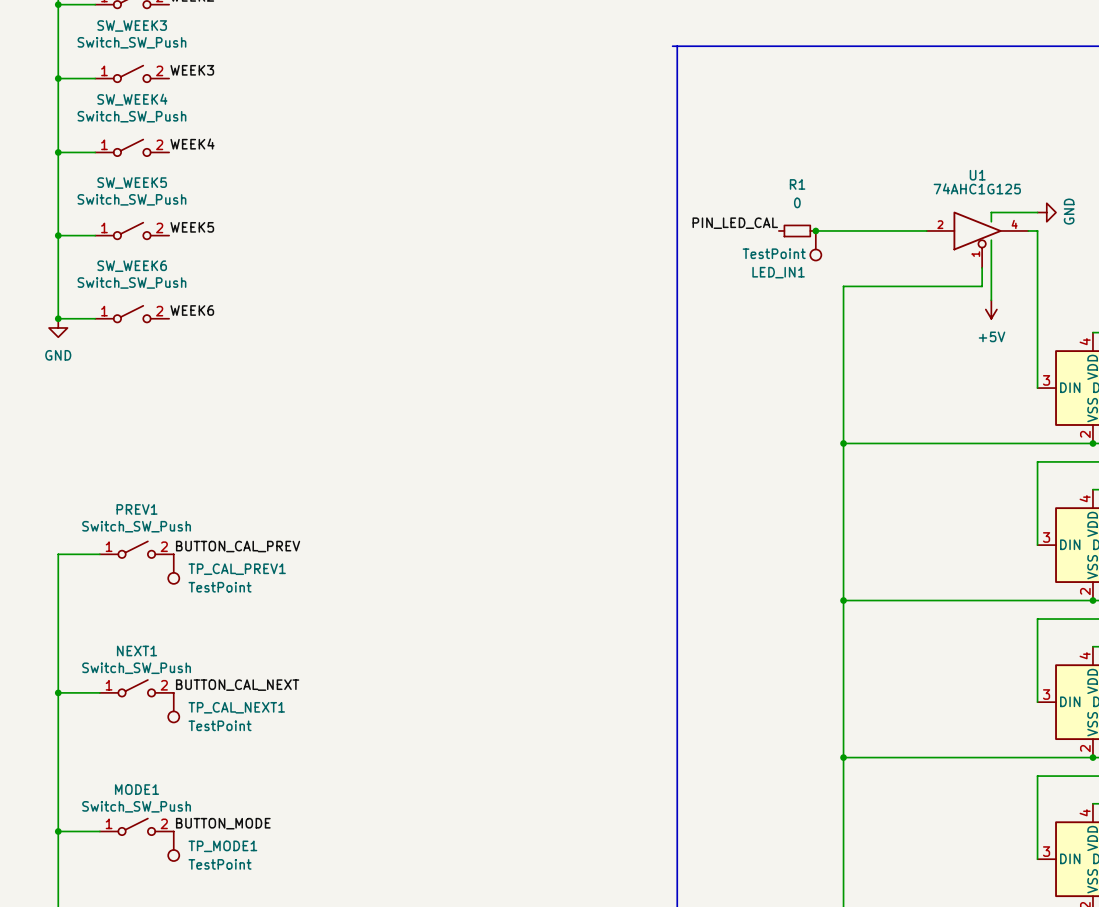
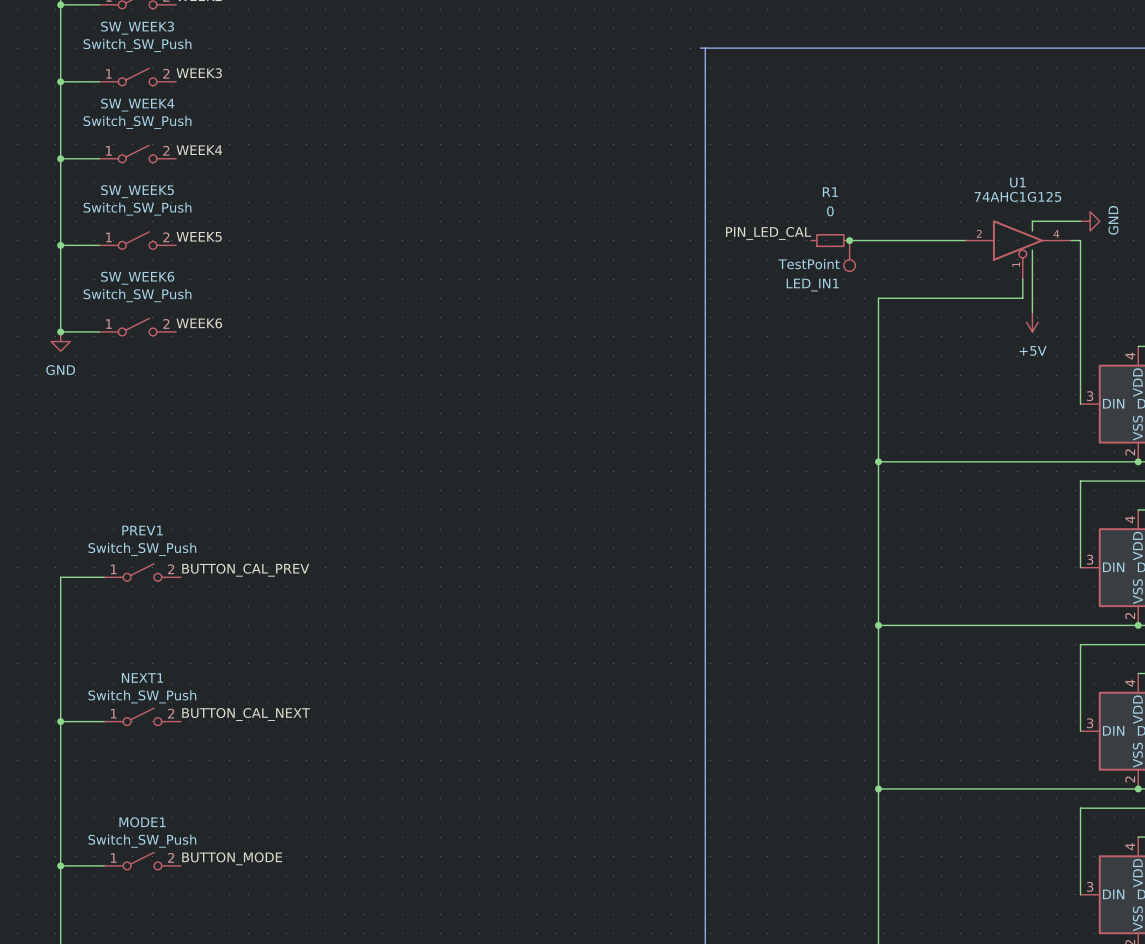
TP_CAL_PREV1: TestPoint (173, 569) -> none
TP_CAL_NEXT1: TestPoint (173, 707) -> none
TP_MODE1: TestPoint (173, 846) -> none

